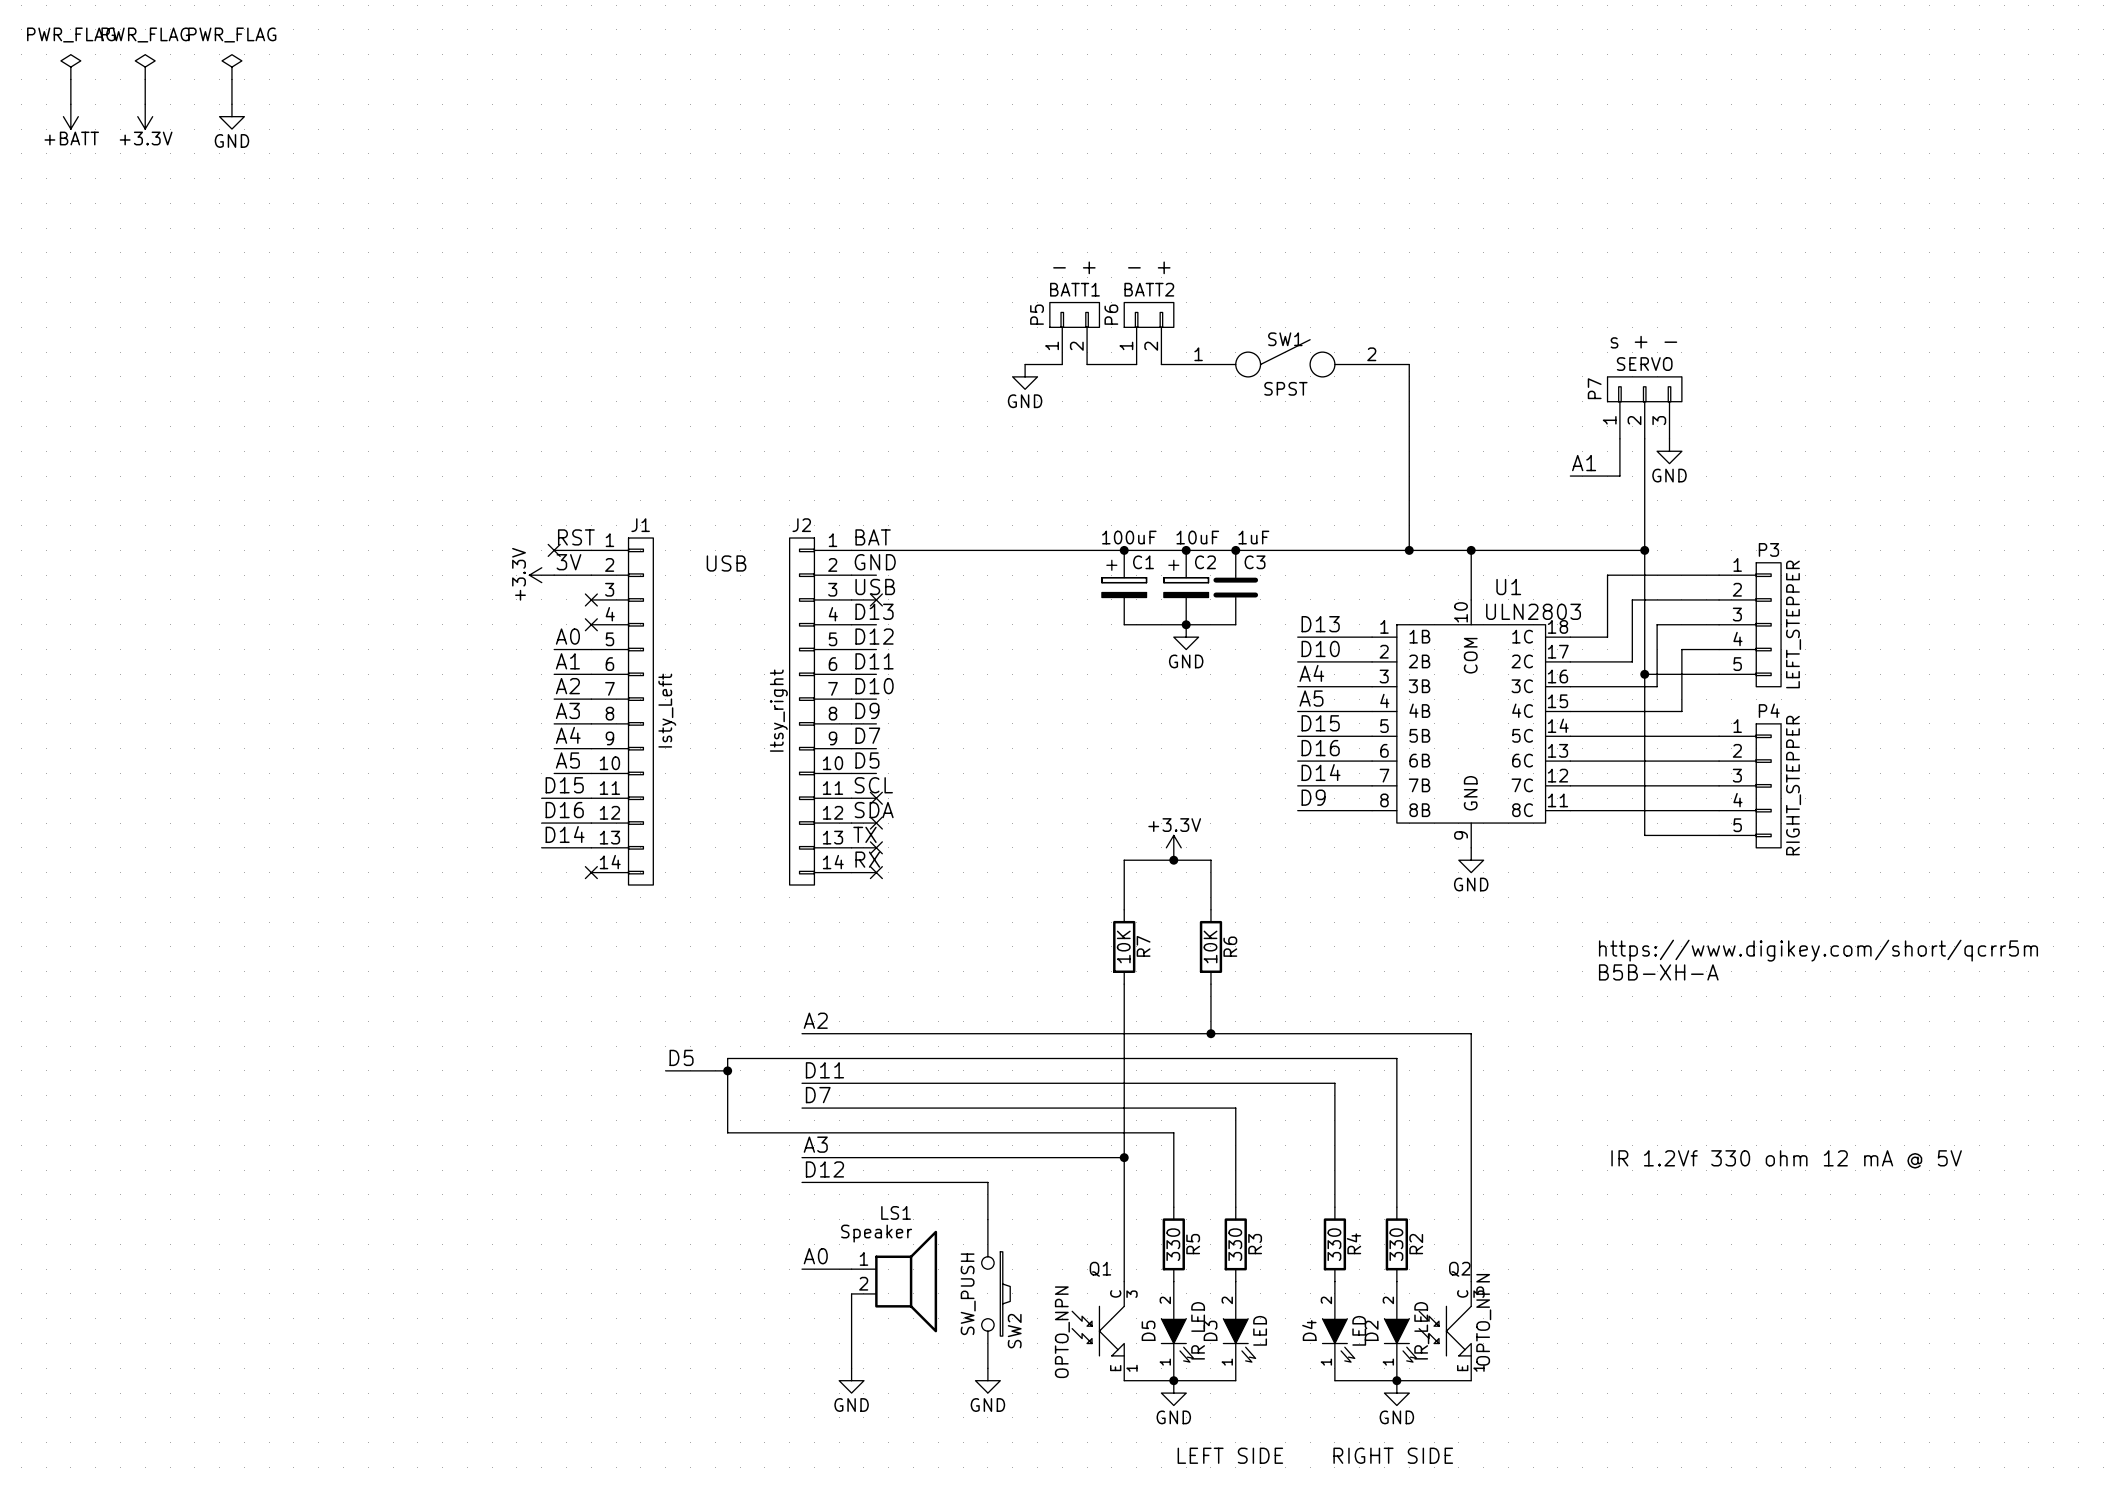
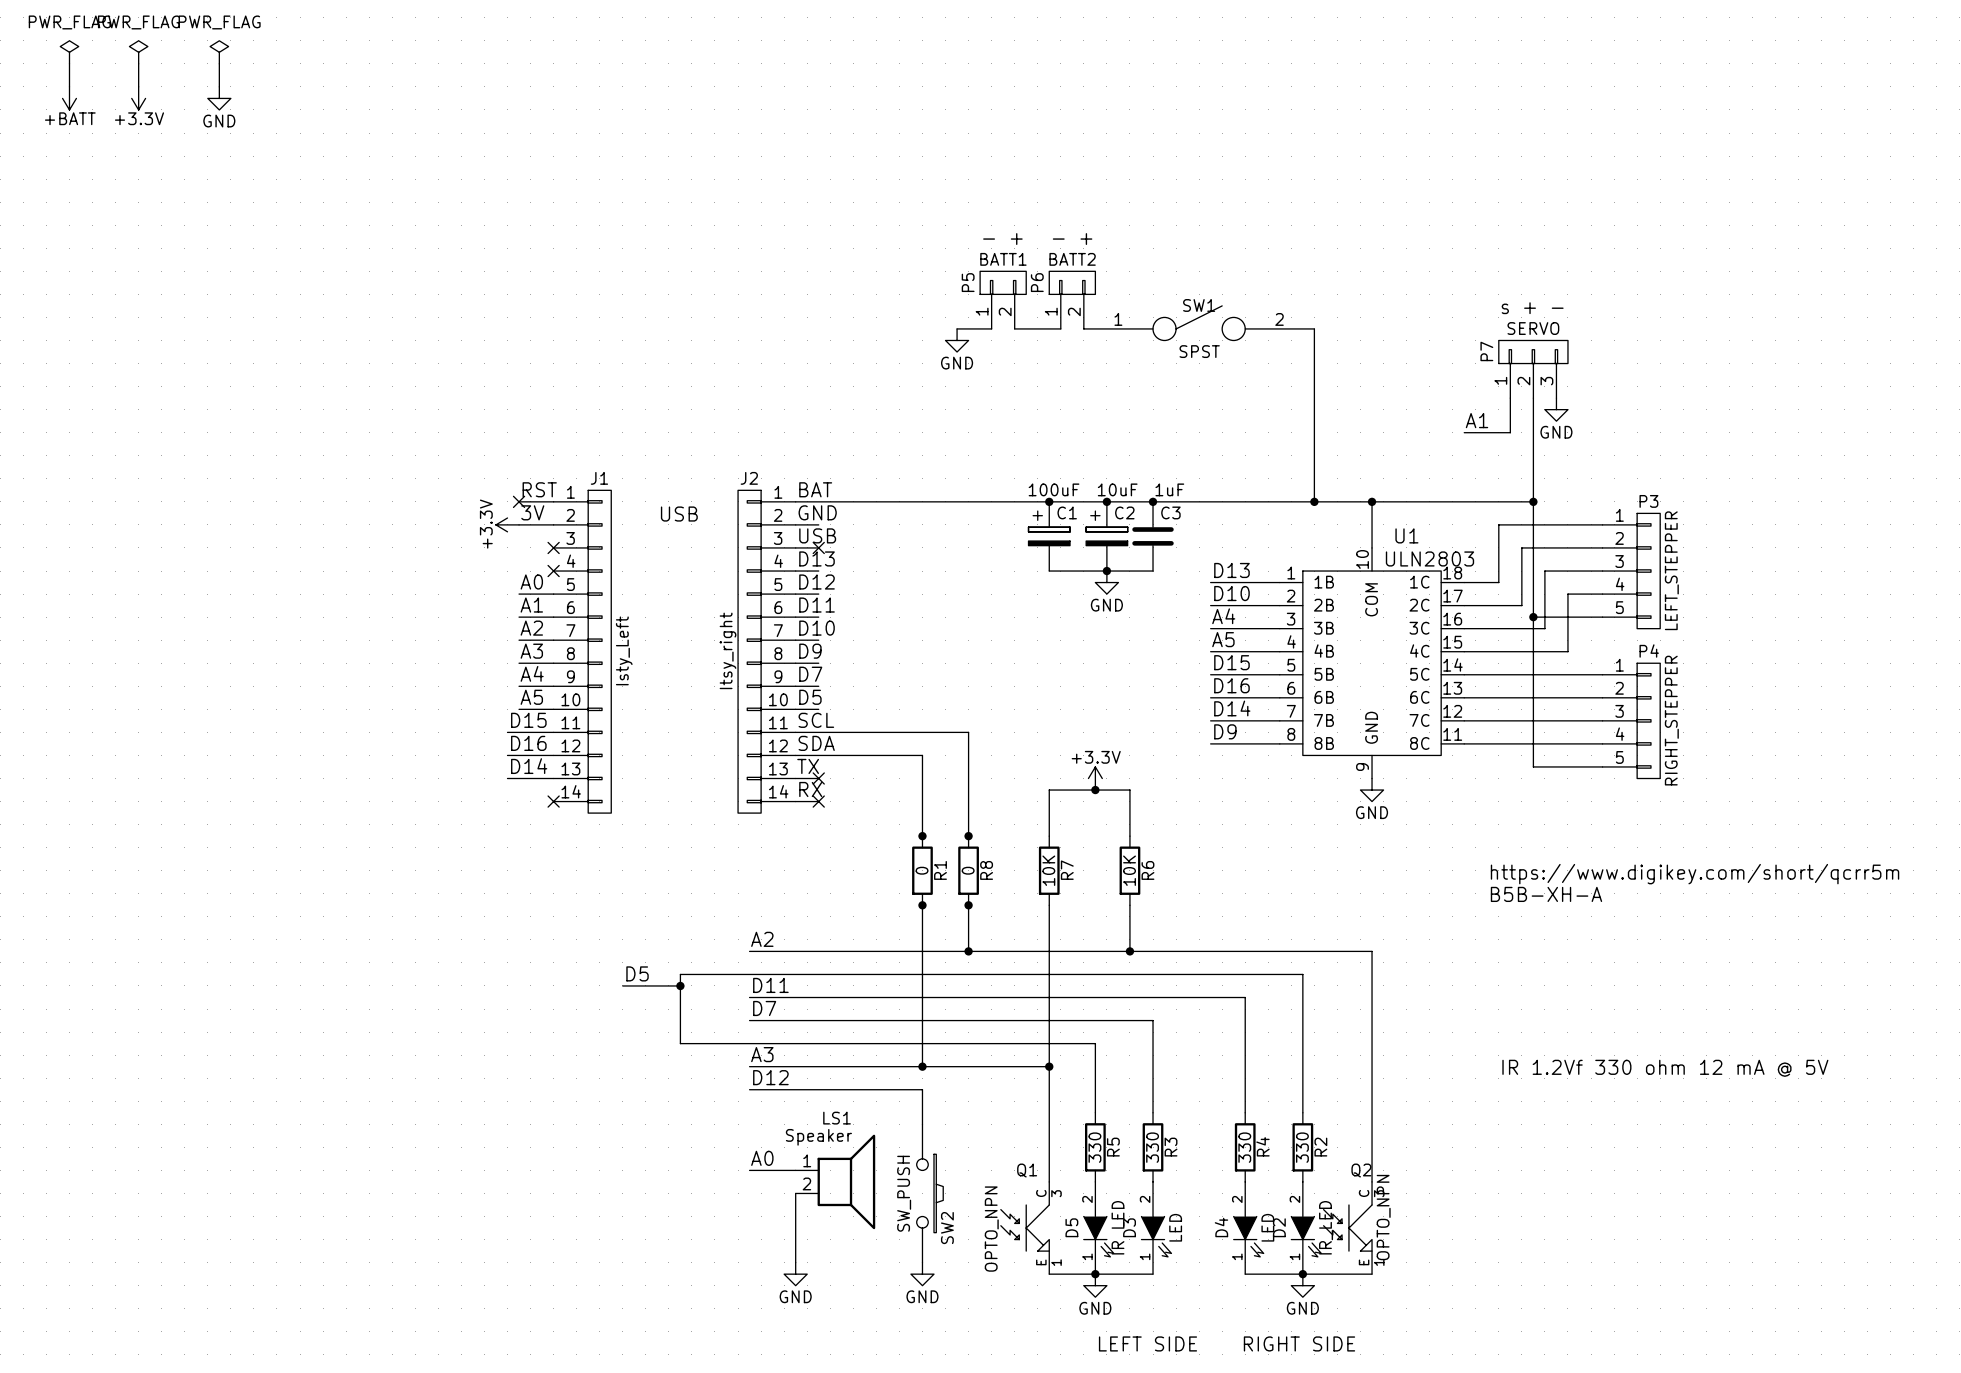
wire: none -> (818, 732) (968, 732) (968, 836)
no-connect mark: (876, 798) -> none
wire: none -> (818, 755) (922, 755) (922, 836)
no-connect mark: (876, 823) -> none
junction: none -> (922, 836)
junction: none -> (968, 836)
R1: none -> 0 (922, 870)
R8: none -> 0 (968, 870)
wire: none -> (922, 905) (922, 1066)
junction: none -> (922, 905)
wire: none -> (968, 905) (968, 951)
junction: none -> (968, 905)
junction: none -> (968, 951)
junction: none -> (922, 1066)

